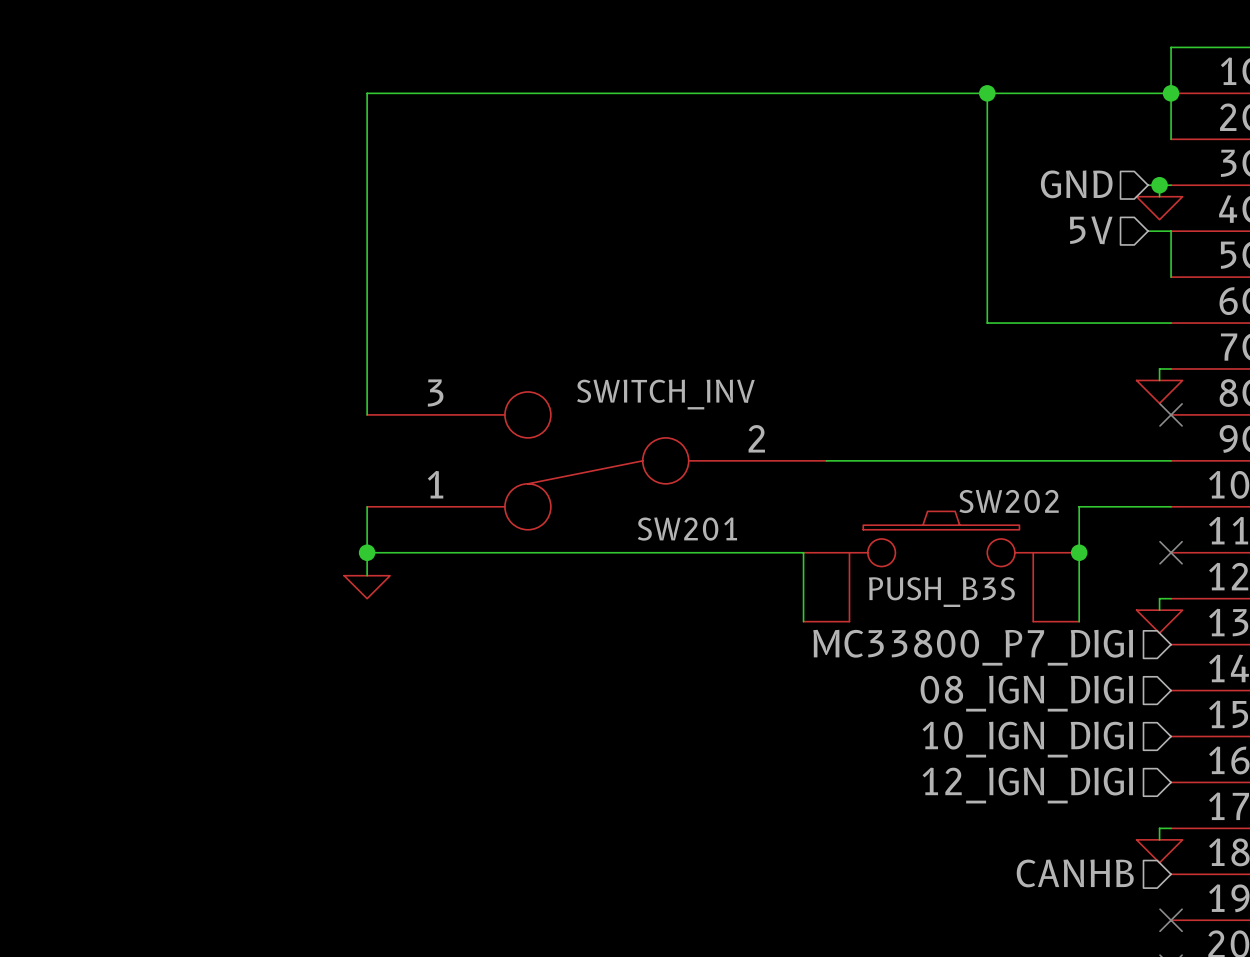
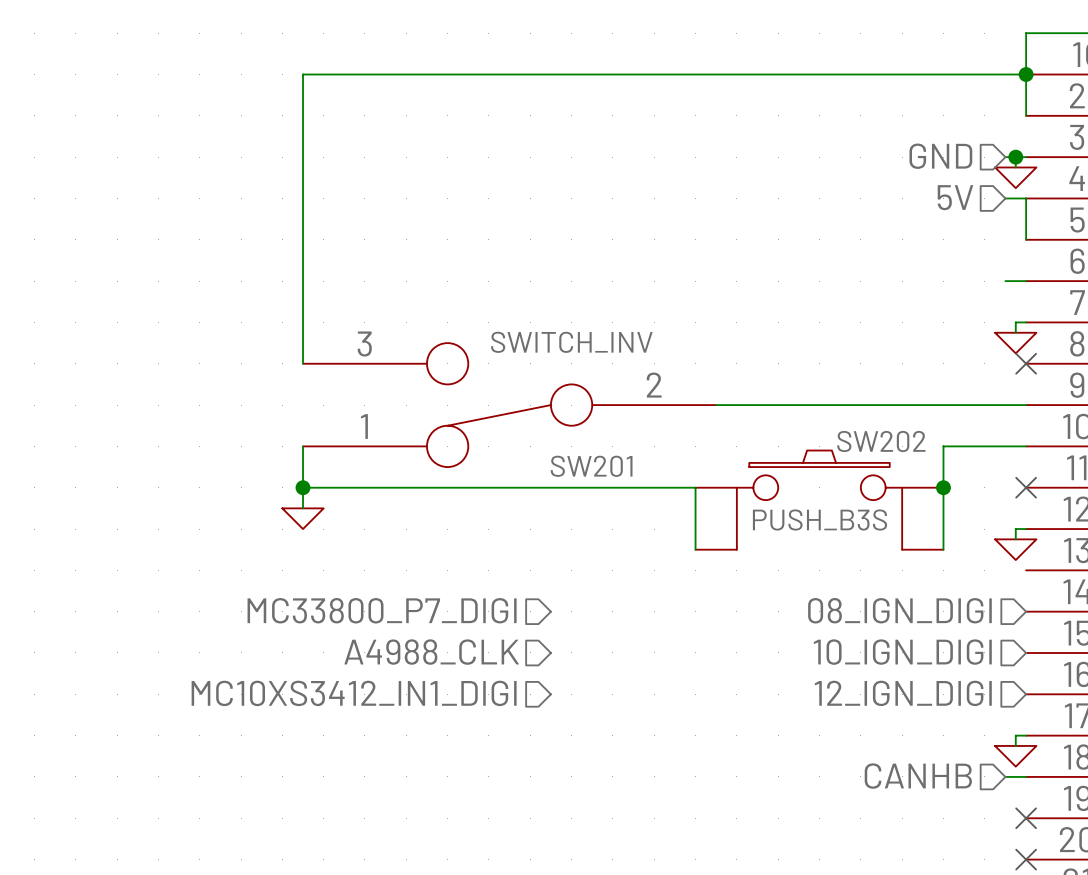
wire: (987, 93) (987, 323) (1148, 323) -> none
junction: (987, 93) -> none
hierarchical label: MC33800_P7_DIGI (973, 647) -> none
hierarchical label: none -> MC33800_P7_DIGI (382, 610)
hierarchical label: none -> A4988_CLK (431, 652)
hierarchical label: none -> MC10XS3412_IN1_DIGI (354, 693)
hierarchical label position: CANHB (1075, 873) -> CANHB (918, 776)
wire: none -> (1005, 776) (1026, 776)

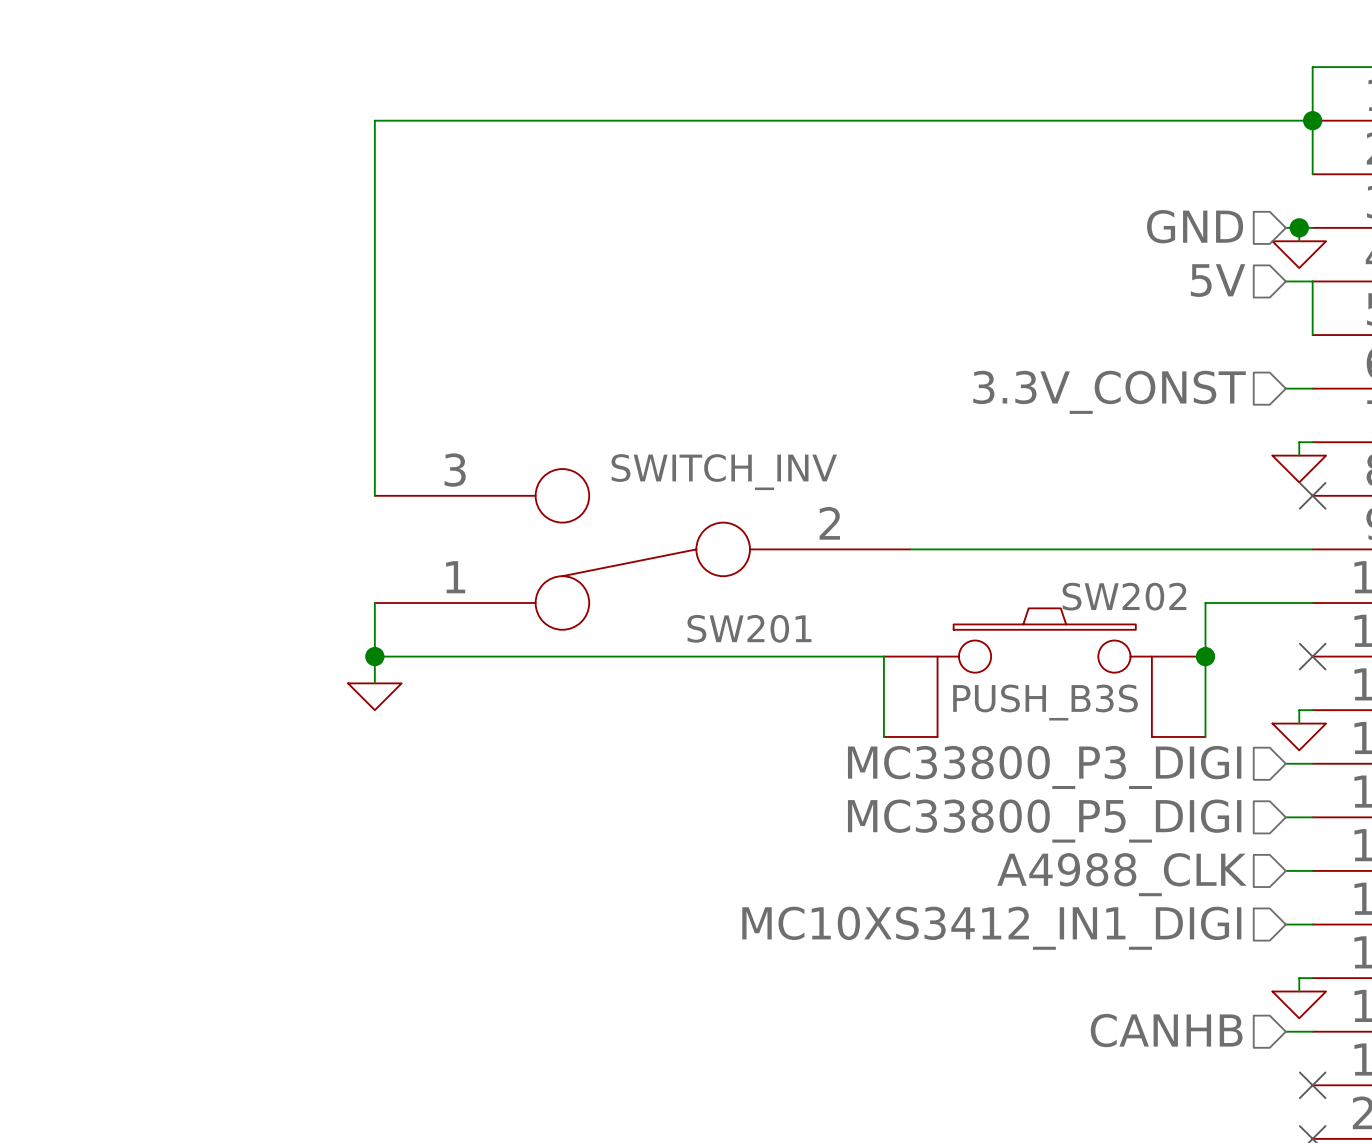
hierarchical label: none -> 3.3V_CONST (1109, 392)
hierarchical label: none -> MC33800_P3_DIGI (1044, 767)
wire: none -> (1285, 763) (1312, 763)
hierarchical label: MC33800_P7_DIGI (382, 610) -> none
hierarchical label: none -> MC33800_P5_DIGI (1044, 821)
hierarchical label: 08_IGN_DIGI (899, 610) -> none
wire: none -> (1285, 817) (1312, 817)
hierarchical label: A4988_CLK (431, 652) -> none
hierarchical label: none -> A4988_CLK (1121, 874)
hierarchical label: 10_IGN_DIGI (902, 652) -> none
wire: none -> (1285, 870) (1312, 870)
hierarchical label: MC10XS3412_IN1_DIGI (354, 693) -> none
hierarchical label: 12_IGN_DIGI (903, 693) -> MC10XS3412_IN1_DIGI (991, 928)
wire: none -> (1285, 924) (1312, 924)

